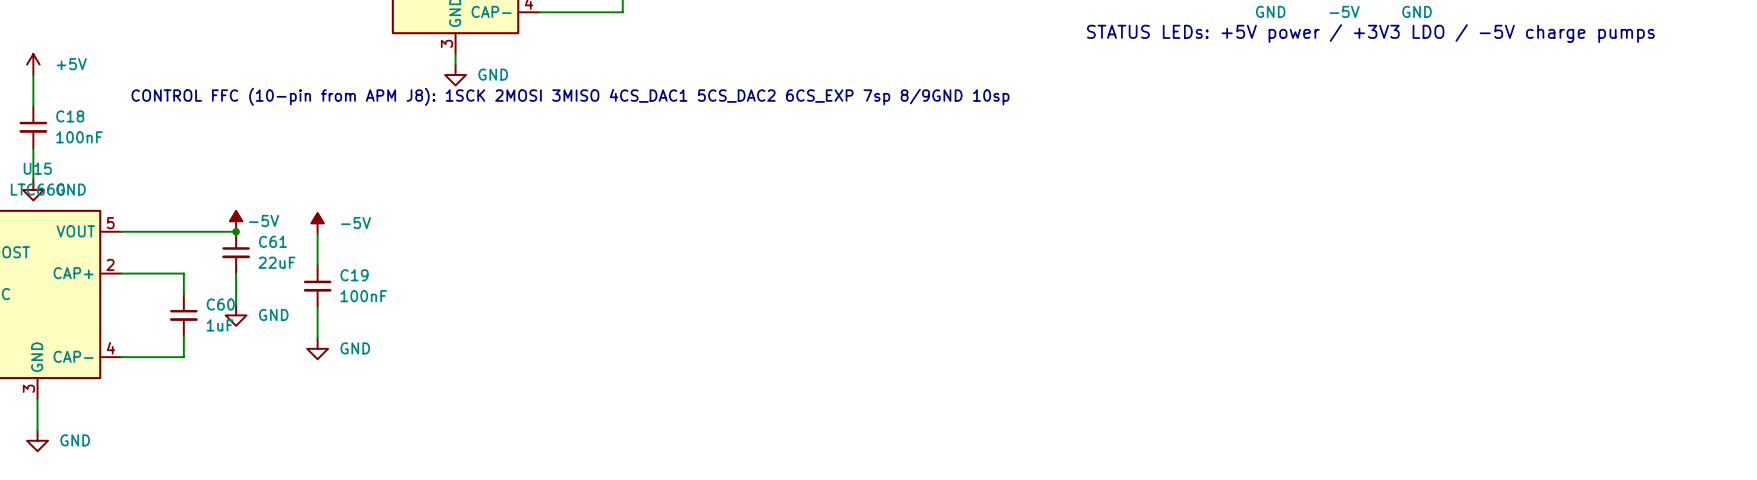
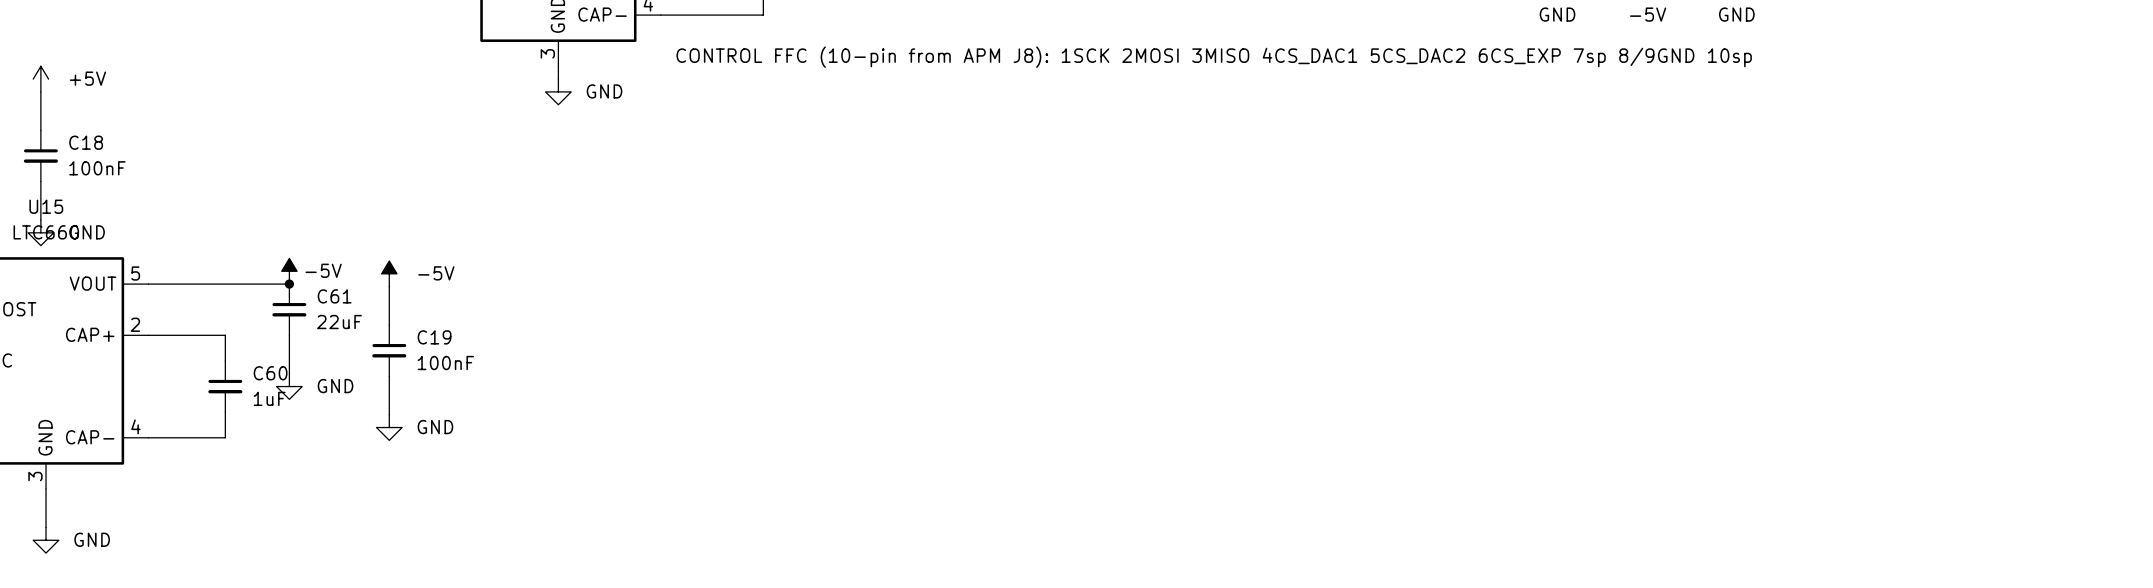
text: STATUS LEDs: +5V power / +3V3 LDO / -5V charge pumps (1370, 33) -> none
text: none -> CONTROL FFC (10-pin from APM J8): 1SCK 2MOSI 3MISO 4CS_DAC1 5CS_DAC2 6CS_EXP 7sp 8/9GND 10sp (1214, 57)
text: CONTROL FFC (10-pin from APM J8): 1SCK 2MOSI 3MISO 4CS_DAC1 5CS_DAC2 6CS_EXP 7sp 8/9GND 10sp (570, 96) -> none

